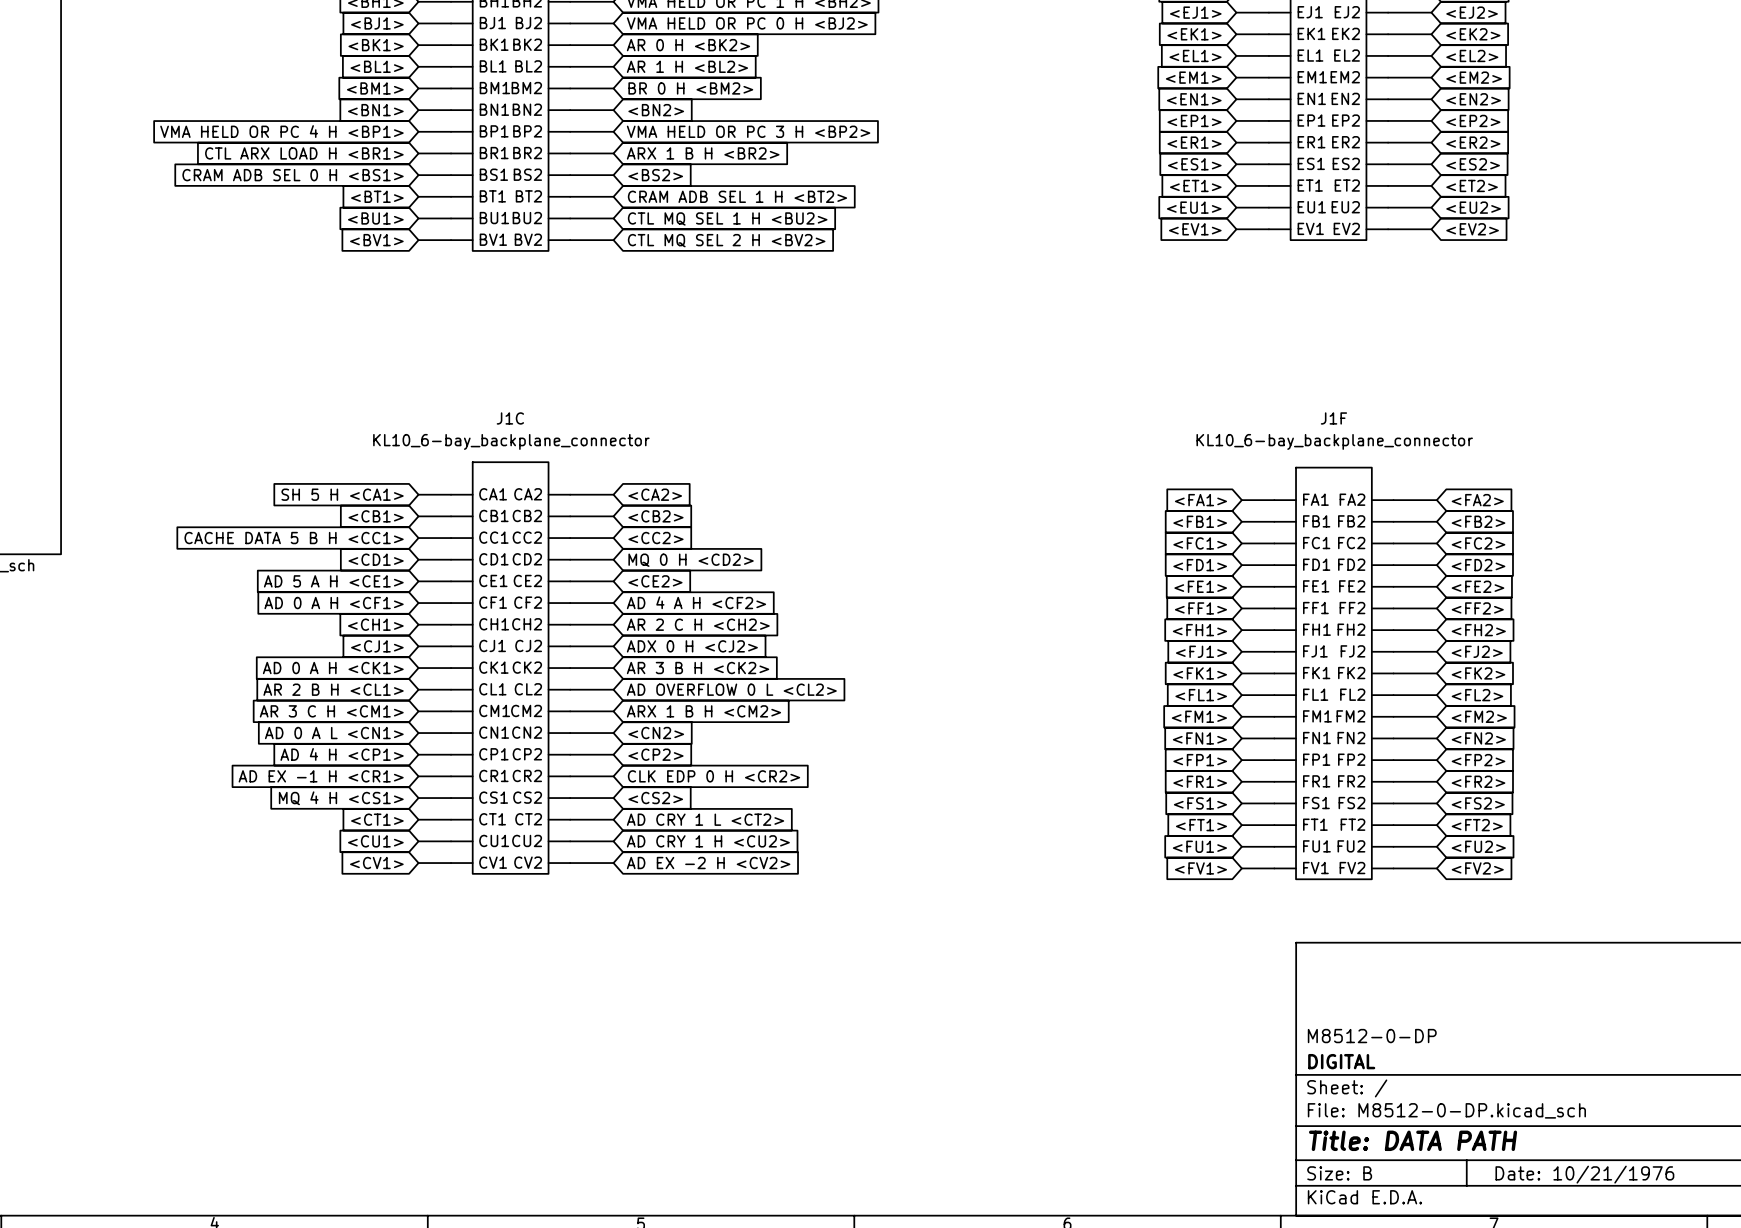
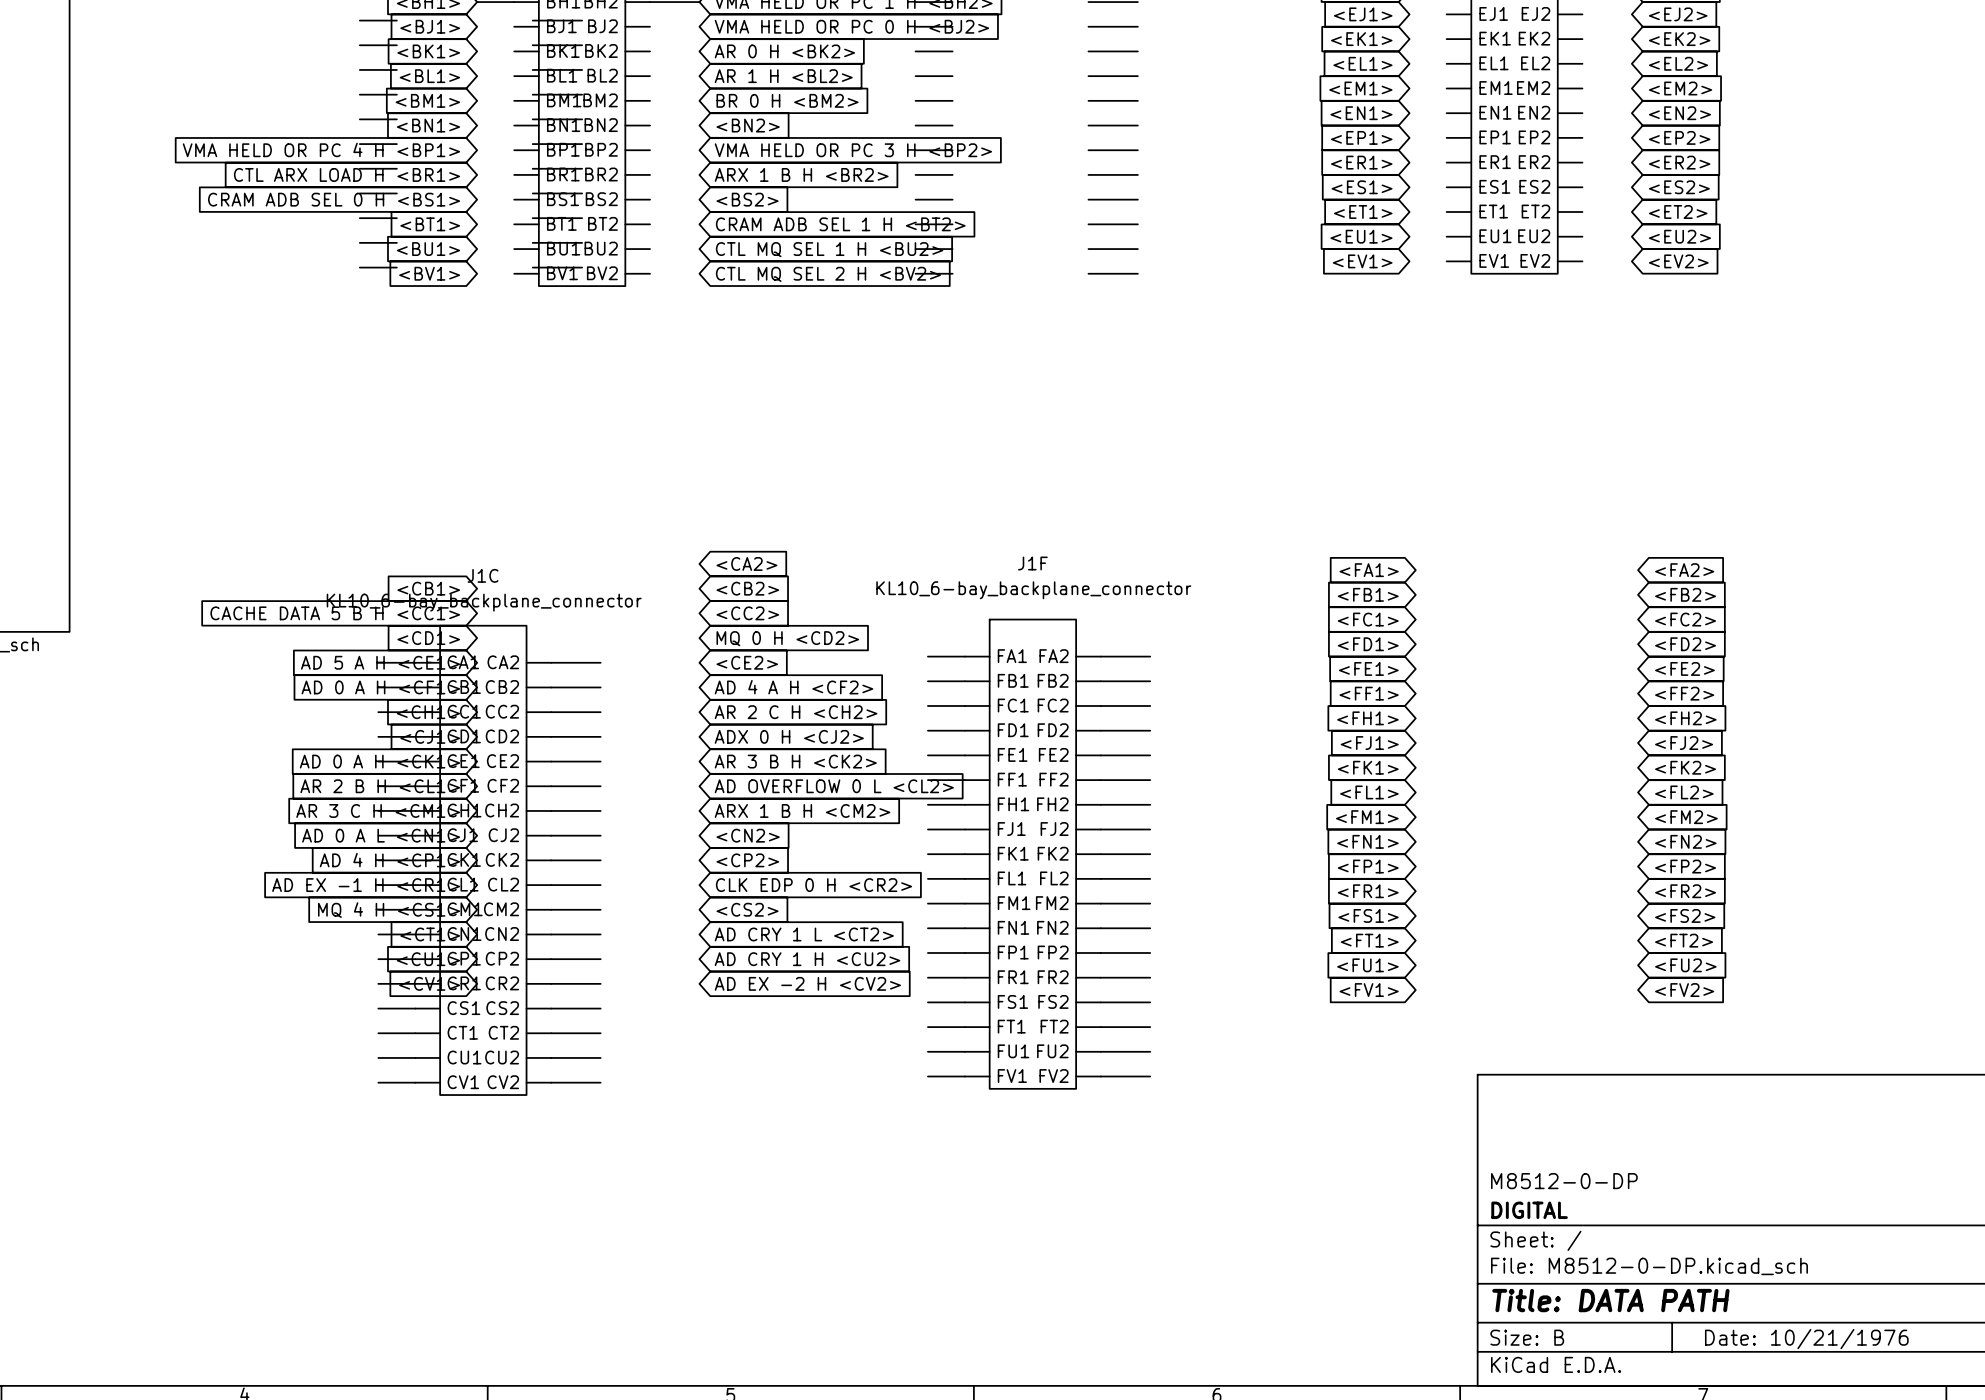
wire: none -> (915, 2) (952, 2)
wire: none -> (1088, 2) (1137, 2)
wire: (1236, 12) (1268, 12) -> none
wire: (1388, 12) (1431, 12) -> none
wire: (418, 23) (451, 23) -> (359, 20) (396, 20)
wire: (570, 23) (613, 23) -> (532, 20) (582, 20)
wire: none -> (915, 26) (952, 26)
wire: none -> (1088, 26) (1137, 26)
wire: (1236, 34) (1268, 34) -> none
wire: (1388, 34) (1431, 34) -> none
wire: (418, 45) (451, 45) -> (359, 45) (396, 45)
wire: (570, 45) (613, 45) -> (532, 45) (582, 45)
wire: none -> (915, 51) (952, 51)
wire: none -> (1088, 51) (1137, 51)
wire: (1236, 55) (1268, 55) -> none
wire: (1388, 55) (1431, 55) -> none
wire: (418, 66) (451, 66) -> (359, 69) (396, 69)
wire: (570, 66) (613, 66) -> (532, 69) (582, 69)
wire: none -> (915, 76) (952, 76)
wire: none -> (1088, 76) (1137, 76)
wire: (1236, 77) (1268, 77) -> none
wire: (1388, 77) (1431, 77) -> none
wire: (418, 88) (451, 88) -> (359, 94) (396, 94)
wire: (570, 88) (613, 88) -> (532, 94) (582, 94)
wire: none -> (915, 100) (952, 100)
wire: none -> (1088, 100) (1137, 100)
wire: (1236, 99) (1268, 99) -> none
wire: (1388, 99) (1431, 99) -> none
wire: (418, 110) (451, 110) -> (359, 119) (396, 119)
wire: (570, 110) (613, 110) -> (532, 119) (582, 119)
wire: none -> (915, 125) (952, 125)
wire: none -> (1088, 125) (1137, 125)
wire: (1236, 120) (1268, 120) -> none
wire: (1388, 120) (1431, 120) -> none
wire: (418, 131) (451, 131) -> (359, 144) (396, 144)
wire: (570, 131) (613, 131) -> (532, 144) (582, 144)
wire: none -> (915, 150) (952, 150)
wire: none -> (1088, 150) (1137, 150)
wire: (1236, 142) (1268, 142) -> none
wire: (1388, 142) (1431, 142) -> none
wire: (418, 153) (451, 153) -> (359, 168) (396, 168)
wire: (570, 153) (613, 153) -> (532, 168) (582, 168)
wire: none -> (915, 174) (952, 174)
wire: none -> (1088, 174) (1137, 174)
wire: (1236, 164) (1268, 164) -> none
wire: (1388, 164) (1431, 164) -> none
wire: (418, 175) (451, 175) -> (359, 193) (396, 193)
wire: (570, 175) (613, 175) -> (532, 193) (582, 193)
wire: none -> (915, 199) (952, 199)
wire: none -> (1088, 199) (1137, 199)
wire: (1236, 185) (1268, 185) -> none
wire: (1388, 185) (1431, 185) -> none
wire: (418, 196) (451, 196) -> (359, 218) (396, 218)
wire: (570, 196) (613, 196) -> (532, 218) (582, 218)
wire: none -> (915, 224) (952, 224)
wire: none -> (1088, 224) (1137, 224)
wire: (1236, 207) (1268, 207) -> none
wire: (1388, 207) (1431, 207) -> none
wire: (418, 218) (451, 218) -> (359, 242) (396, 242)
wire: (570, 218) (613, 218) -> (532, 242) (582, 242)
wire: none -> (915, 249) (952, 249)
wire: none -> (1088, 249) (1137, 249)
wire: (1236, 229) (1268, 229) -> none
wire: (1388, 229) (1431, 229) -> none
wire: (418, 240) (451, 240) -> (359, 267) (396, 267)
wire: (570, 240) (613, 240) -> (532, 267) (582, 267)
wire: none -> (915, 273) (952, 273)
wire: none -> (1088, 273) (1137, 273)
global label: SH 5 H <CA1> (342, 494) -> none
wire: (418, 494) (451, 494) -> (378, 662) (415, 662)
wire: (570, 494) (613, 494) -> (551, 662) (600, 662)
wire: (1241, 500) (1274, 500) -> none
wire: (1393, 500) (1436, 500) -> none
wire: (418, 516) (451, 516) -> (378, 687) (415, 687)
wire: (570, 516) (613, 516) -> (551, 687) (600, 687)
wire: (1241, 521) (1274, 521) -> none
wire: (1393, 521) (1436, 521) -> none
wire: (418, 538) (451, 538) -> (378, 712) (415, 712)
wire: (570, 538) (613, 538) -> (551, 712) (600, 712)
wire: (1241, 543) (1274, 543) -> none
wire: (1393, 543) (1436, 543) -> none
wire: (418, 559) (451, 559) -> (378, 736) (415, 736)
wire: (570, 559) (613, 559) -> (551, 736) (600, 736)
wire: (1241, 565) (1274, 565) -> none
wire: (1393, 565) (1436, 565) -> none
wire: none -> (927, 656) (964, 656)
wire: none -> (1100, 656) (1150, 656)
wire: (418, 581) (451, 581) -> (378, 761) (415, 761)
wire: (570, 581) (613, 581) -> (551, 761) (600, 761)
wire: (1241, 586) (1274, 586) -> none
wire: (1393, 586) (1436, 586) -> none
wire: none -> (927, 681) (964, 681)
wire: none -> (1100, 681) (1150, 681)
wire: (418, 603) (451, 603) -> (378, 786) (415, 786)
wire: (570, 603) (613, 603) -> (551, 786) (600, 786)
wire: (1241, 608) (1274, 608) -> none
wire: (1393, 608) (1436, 608) -> none
wire: none -> (927, 706) (964, 706)
wire: none -> (1100, 706) (1150, 706)
wire: (418, 624) (451, 624) -> (378, 810) (415, 810)
wire: (570, 624) (613, 624) -> (551, 810) (600, 810)
wire: (1241, 630) (1274, 630) -> none
wire: (1393, 630) (1436, 630) -> none
wire: none -> (927, 730) (964, 730)
wire: none -> (1100, 730) (1150, 730)
wire: (418, 646) (451, 646) -> (378, 835) (415, 835)
wire: (570, 646) (613, 646) -> (551, 835) (600, 835)
wire: (1241, 651) (1274, 651) -> none
wire: (1393, 651) (1436, 651) -> none
wire: none -> (927, 755) (964, 755)
wire: none -> (1100, 755) (1150, 755)
wire: (418, 668) (451, 668) -> (378, 860) (415, 860)
J1C position: (510, 668) -> (483, 860)
wire: (570, 668) (613, 668) -> (551, 860) (600, 860)
wire: (1241, 673) (1274, 673) -> none
J1F position: (1333, 673) -> (1032, 854)
wire: (1393, 673) (1436, 673) -> none
wire: none -> (927, 780) (964, 780)
wire: none -> (1100, 780) (1150, 780)
wire: (418, 689) (451, 689) -> (378, 885) (415, 885)
wire: (570, 689) (613, 689) -> (551, 885) (600, 885)
wire: (1241, 695) (1274, 695) -> none
wire: (1393, 695) (1436, 695) -> none
wire: none -> (927, 804) (964, 804)
wire: none -> (1100, 804) (1150, 804)
wire: (418, 711) (451, 711) -> (378, 909) (415, 909)
wire: (570, 711) (613, 711) -> (551, 909) (600, 909)
wire: (1241, 716) (1274, 716) -> none
wire: (1393, 716) (1436, 716) -> none
wire: none -> (927, 829) (964, 829)
wire: none -> (1100, 829) (1150, 829)
wire: (418, 733) (451, 733) -> (378, 934) (415, 934)
wire: (570, 733) (613, 733) -> (551, 934) (600, 934)
wire: (1241, 738) (1274, 738) -> none
wire: (1393, 738) (1436, 738) -> none
wire: none -> (927, 854) (964, 854)
wire: none -> (1100, 854) (1150, 854)
wire: (418, 754) (451, 754) -> (378, 959) (415, 959)
wire: (570, 754) (613, 754) -> (551, 959) (600, 959)
wire: (1241, 760) (1274, 760) -> none
wire: (1393, 760) (1436, 760) -> none
wire: none -> (927, 878) (964, 878)
wire: none -> (1100, 878) (1150, 878)
wire: (418, 776) (451, 776) -> (378, 983) (415, 983)
wire: (570, 776) (613, 776) -> (551, 983) (600, 983)
wire: (1241, 781) (1274, 781) -> none
wire: (1393, 781) (1436, 781) -> none
wire: none -> (927, 903) (964, 903)
wire: none -> (1100, 903) (1150, 903)
wire: (418, 798) (451, 798) -> (378, 1008) (415, 1008)
wire: (570, 798) (613, 798) -> (551, 1008) (600, 1008)
wire: (1241, 803) (1274, 803) -> none
wire: (1393, 803) (1436, 803) -> none
wire: none -> (927, 928) (964, 928)
wire: none -> (1100, 928) (1150, 928)
wire: (418, 819) (451, 819) -> (378, 1033) (415, 1033)
wire: (570, 819) (613, 819) -> (551, 1033) (600, 1033)
wire: (1241, 825) (1274, 825) -> none
wire: (1393, 825) (1436, 825) -> none
wire: none -> (927, 953) (964, 953)
wire: none -> (1100, 953) (1150, 953)
wire: (418, 841) (451, 841) -> (378, 1057) (415, 1057)
wire: (570, 841) (613, 841) -> (551, 1057) (600, 1057)
wire: (1241, 846) (1274, 846) -> none
wire: (1393, 846) (1436, 846) -> none
wire: none -> (927, 977) (964, 977)
wire: none -> (1100, 977) (1150, 977)
wire: (418, 863) (451, 863) -> (378, 1082) (415, 1082)
wire: (570, 863) (613, 863) -> (551, 1082) (600, 1082)
wire: (1241, 868) (1274, 868) -> none
wire: (1393, 868) (1436, 868) -> none
wire: none -> (927, 1002) (964, 1002)
wire: none -> (1100, 1002) (1150, 1002)
wire: none -> (927, 1027) (964, 1027)
wire: none -> (1100, 1027) (1150, 1027)
wire: none -> (927, 1051) (964, 1051)
wire: none -> (1100, 1051) (1150, 1051)
wire: none -> (927, 1076) (964, 1076)
wire: none -> (1100, 1076) (1150, 1076)

